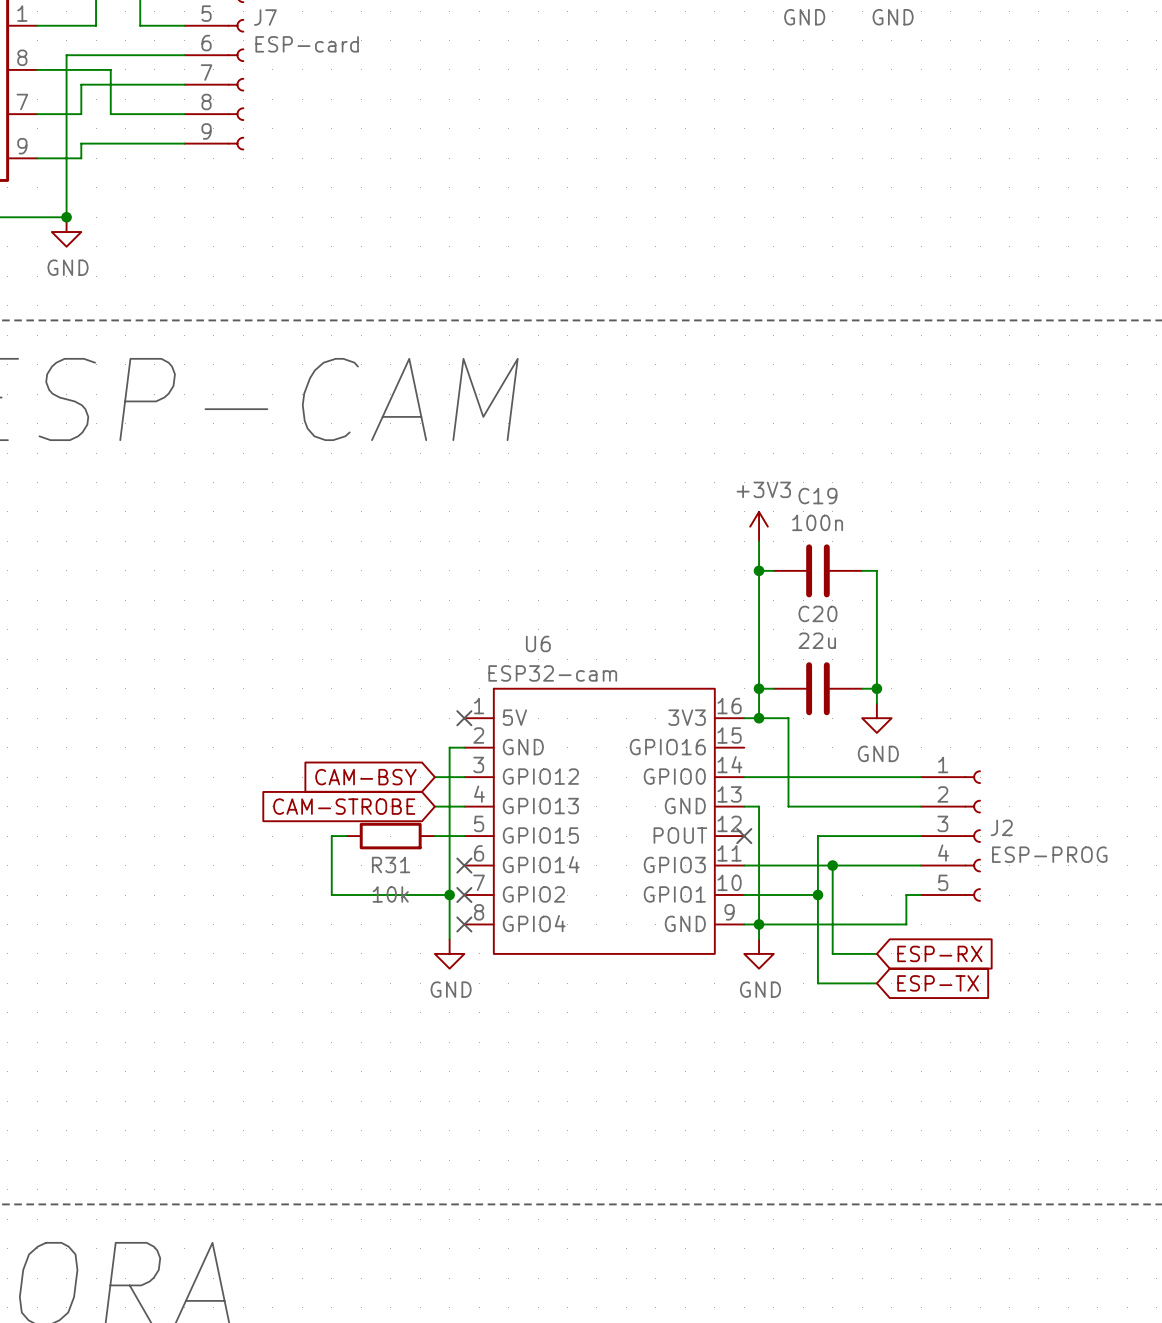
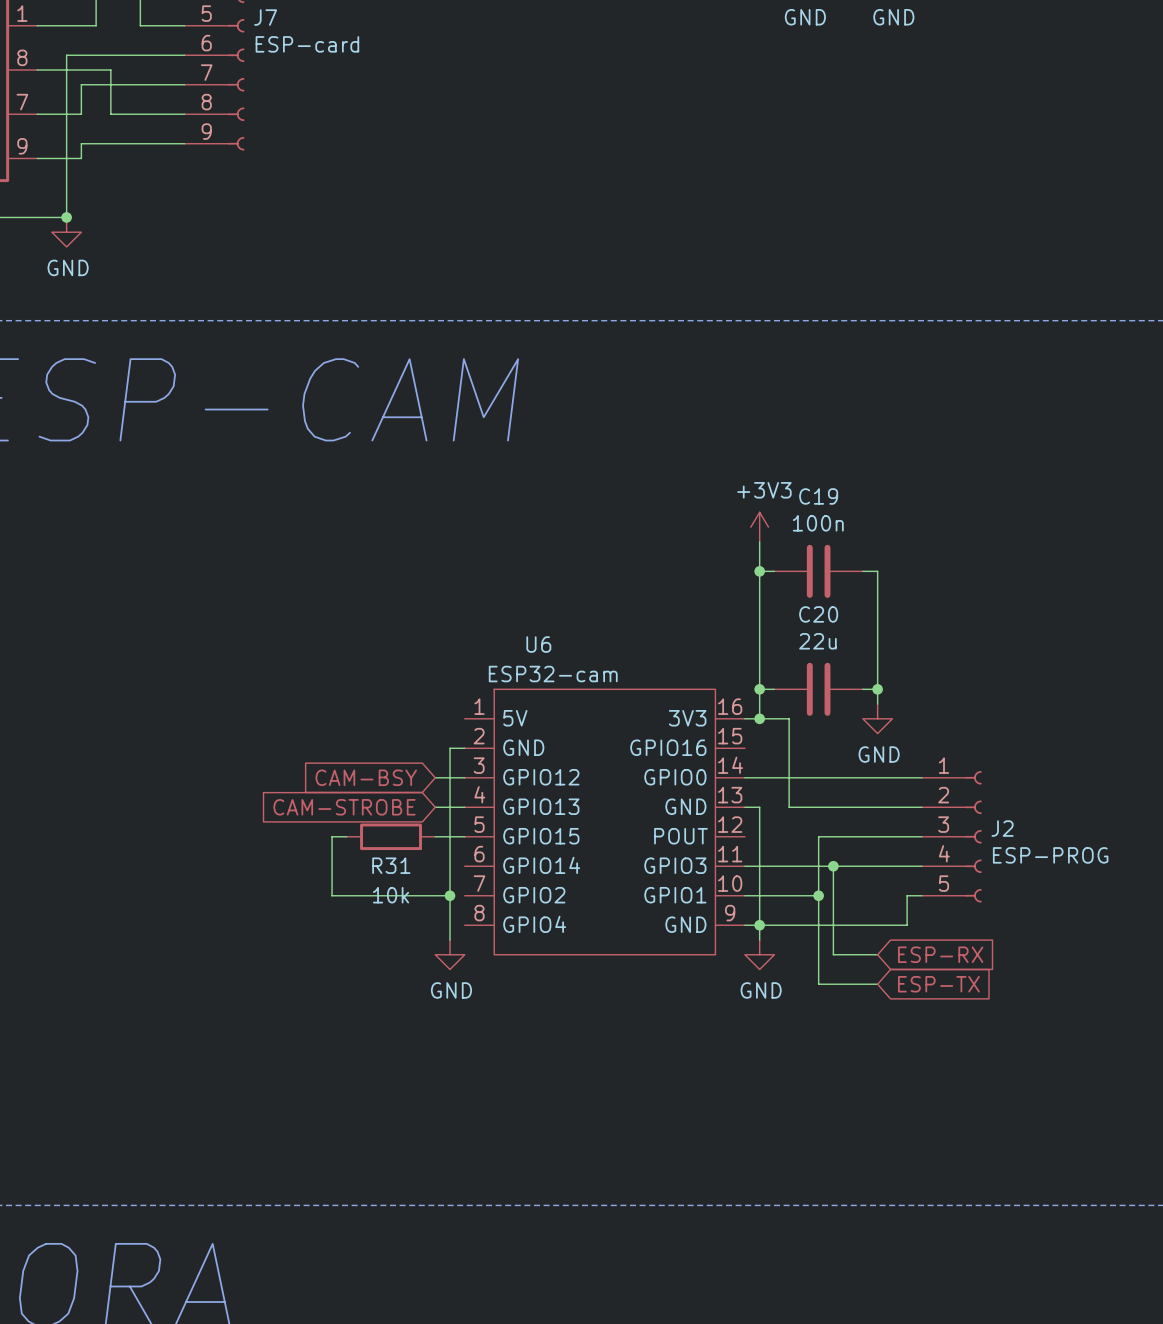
no-connect mark: (464, 718) -> none
no-connect mark: (744, 836) -> none
no-connect mark: (464, 865) -> none
no-connect mark: (464, 895) -> none
no-connect mark: (464, 924) -> none

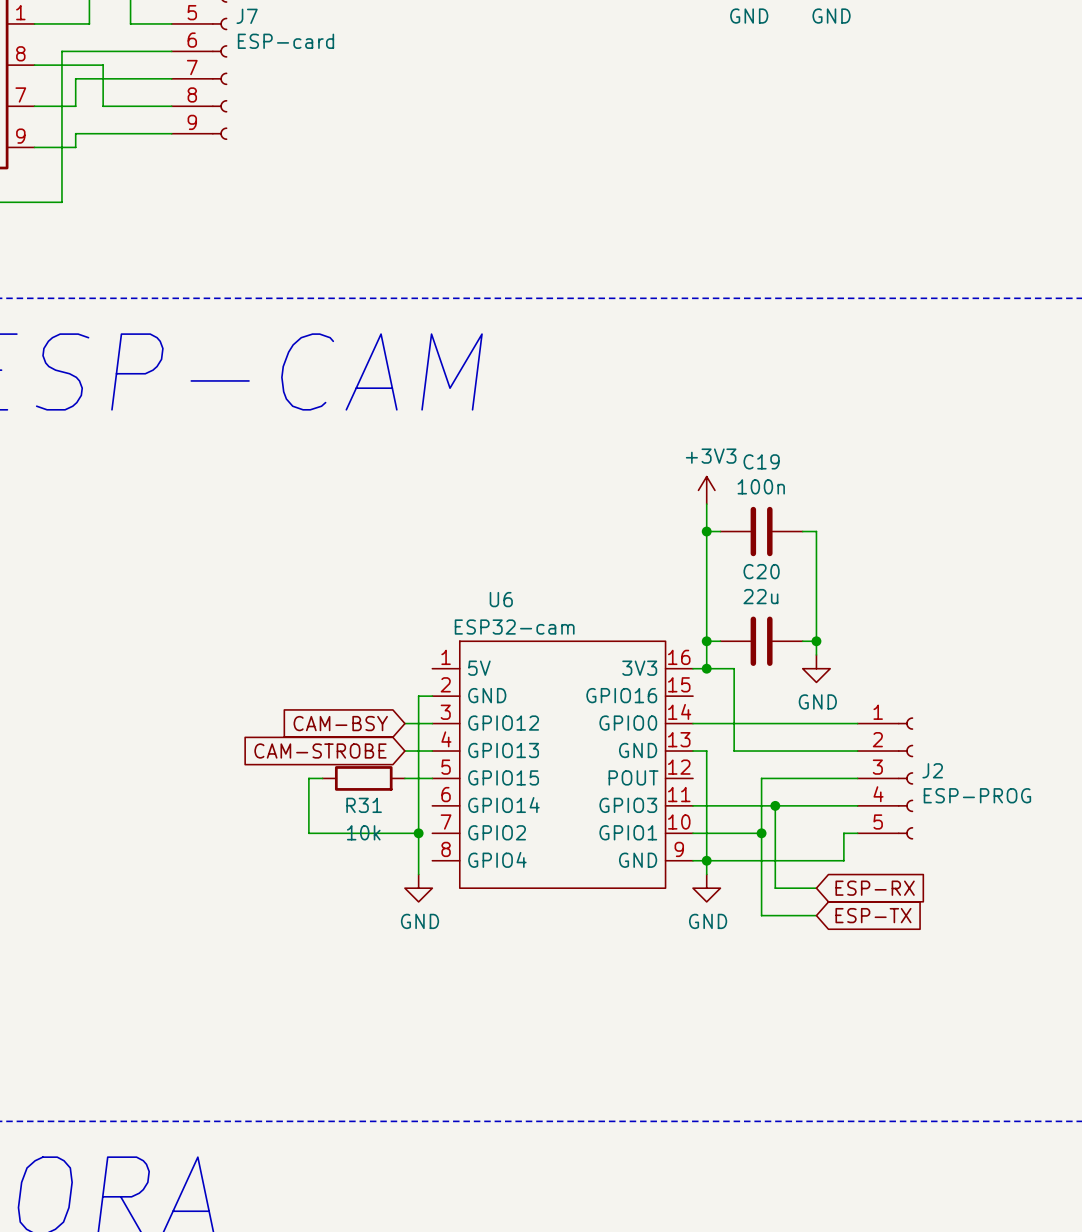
junction: (66, 217) -> none
power symbol: GND (66, 232) -> none

